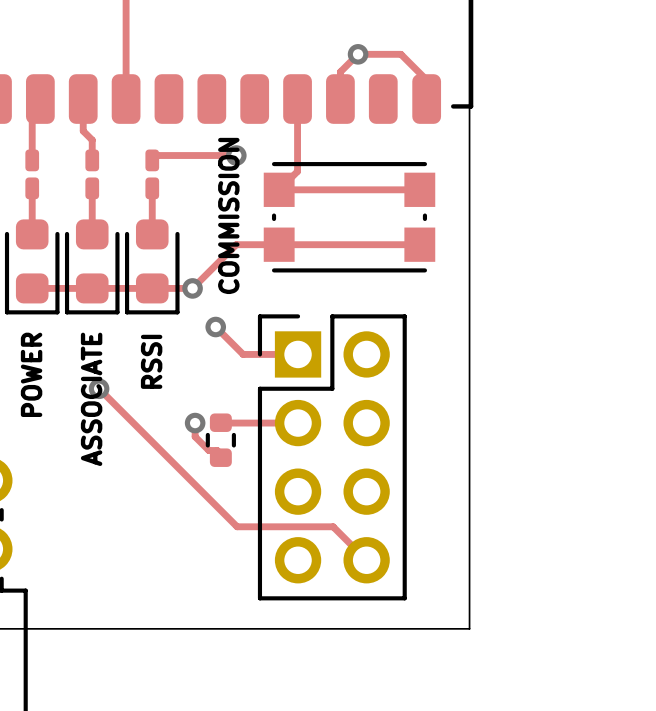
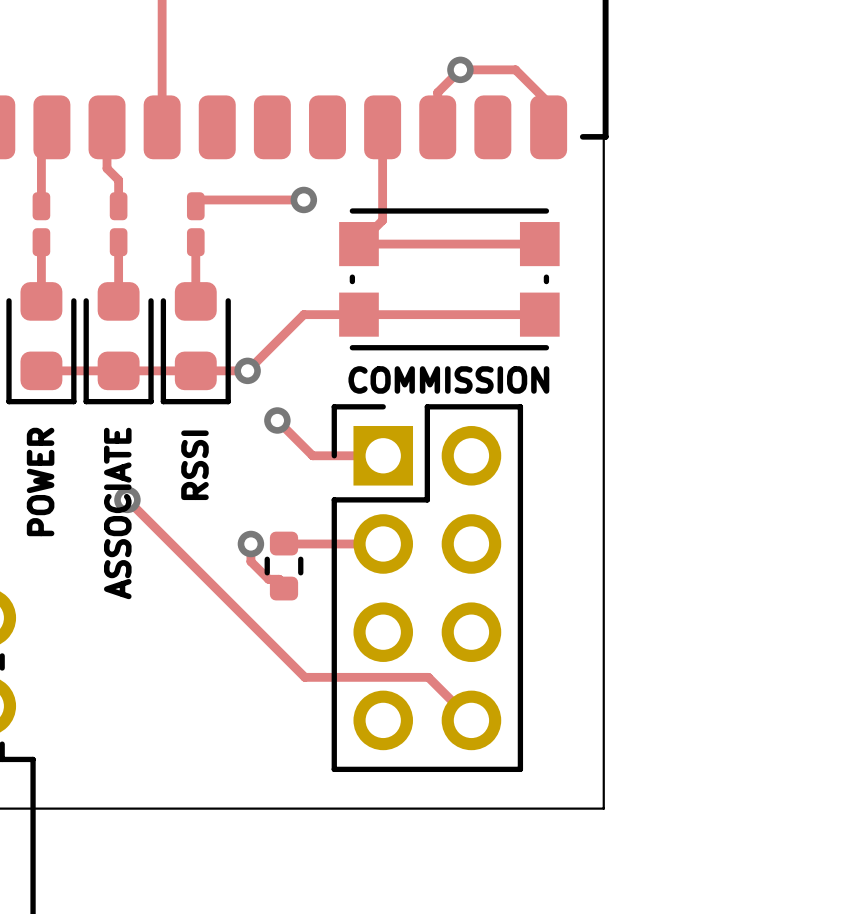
part value rotation: 0° (228, 215) -> 90° clockwise (448, 379)

